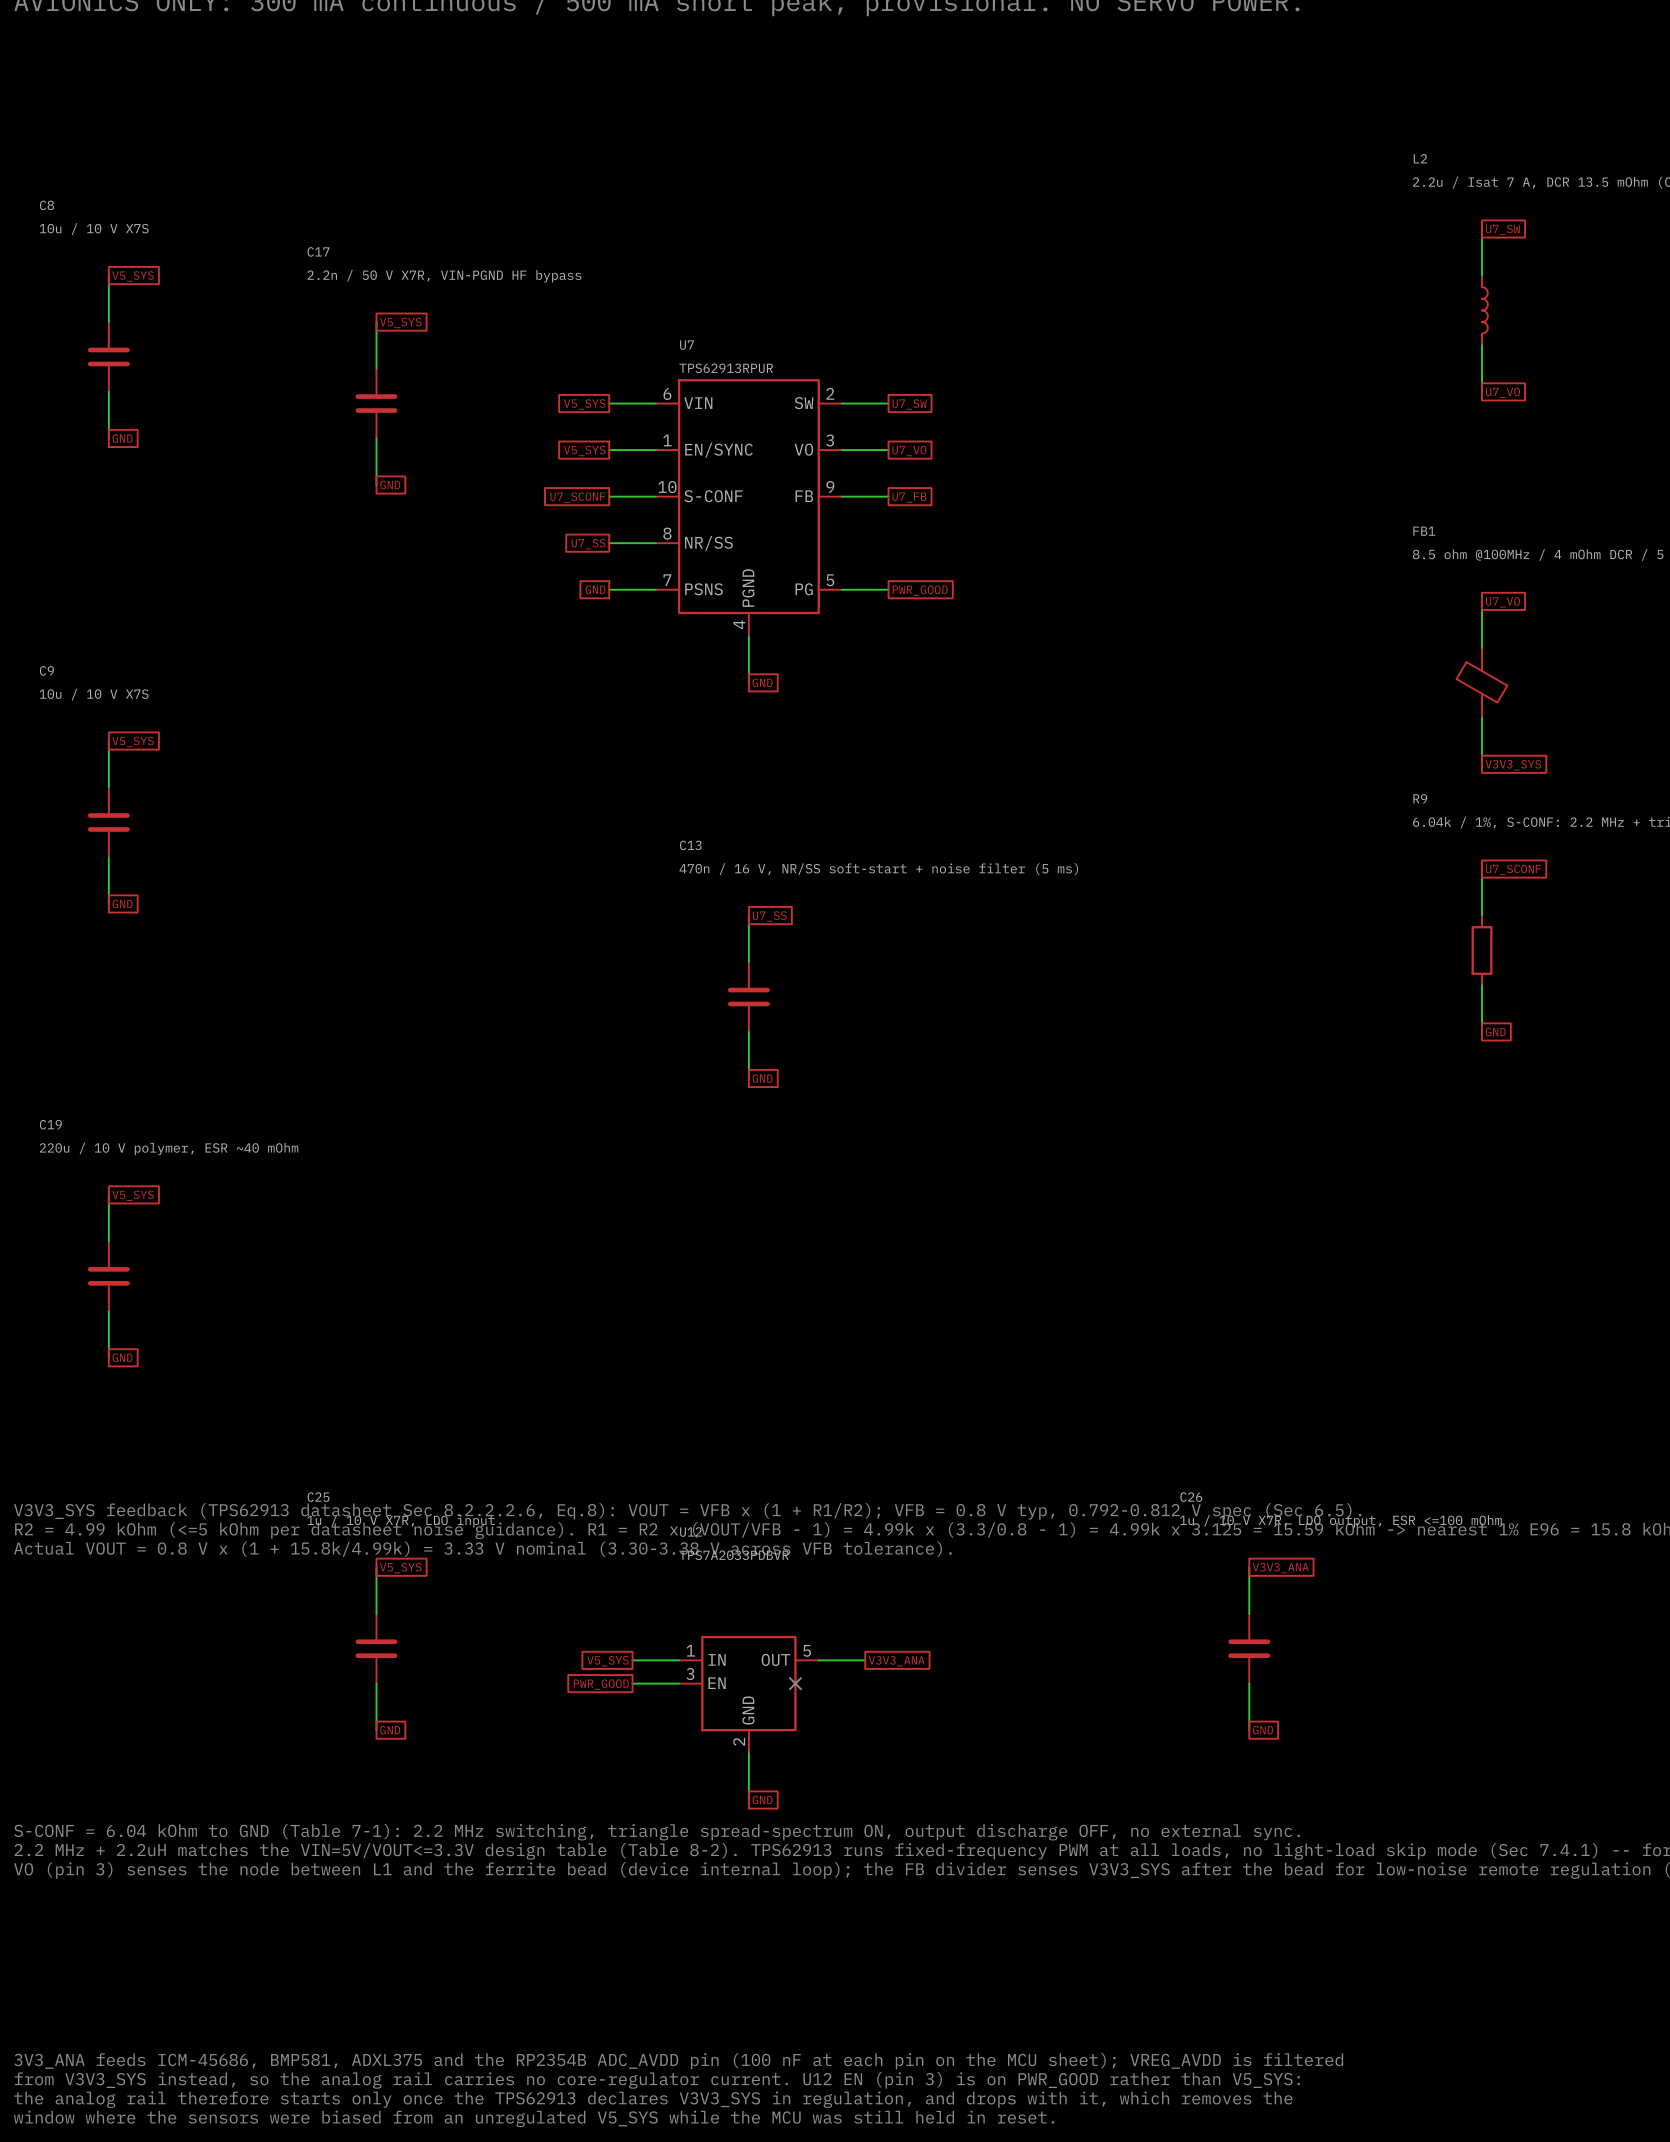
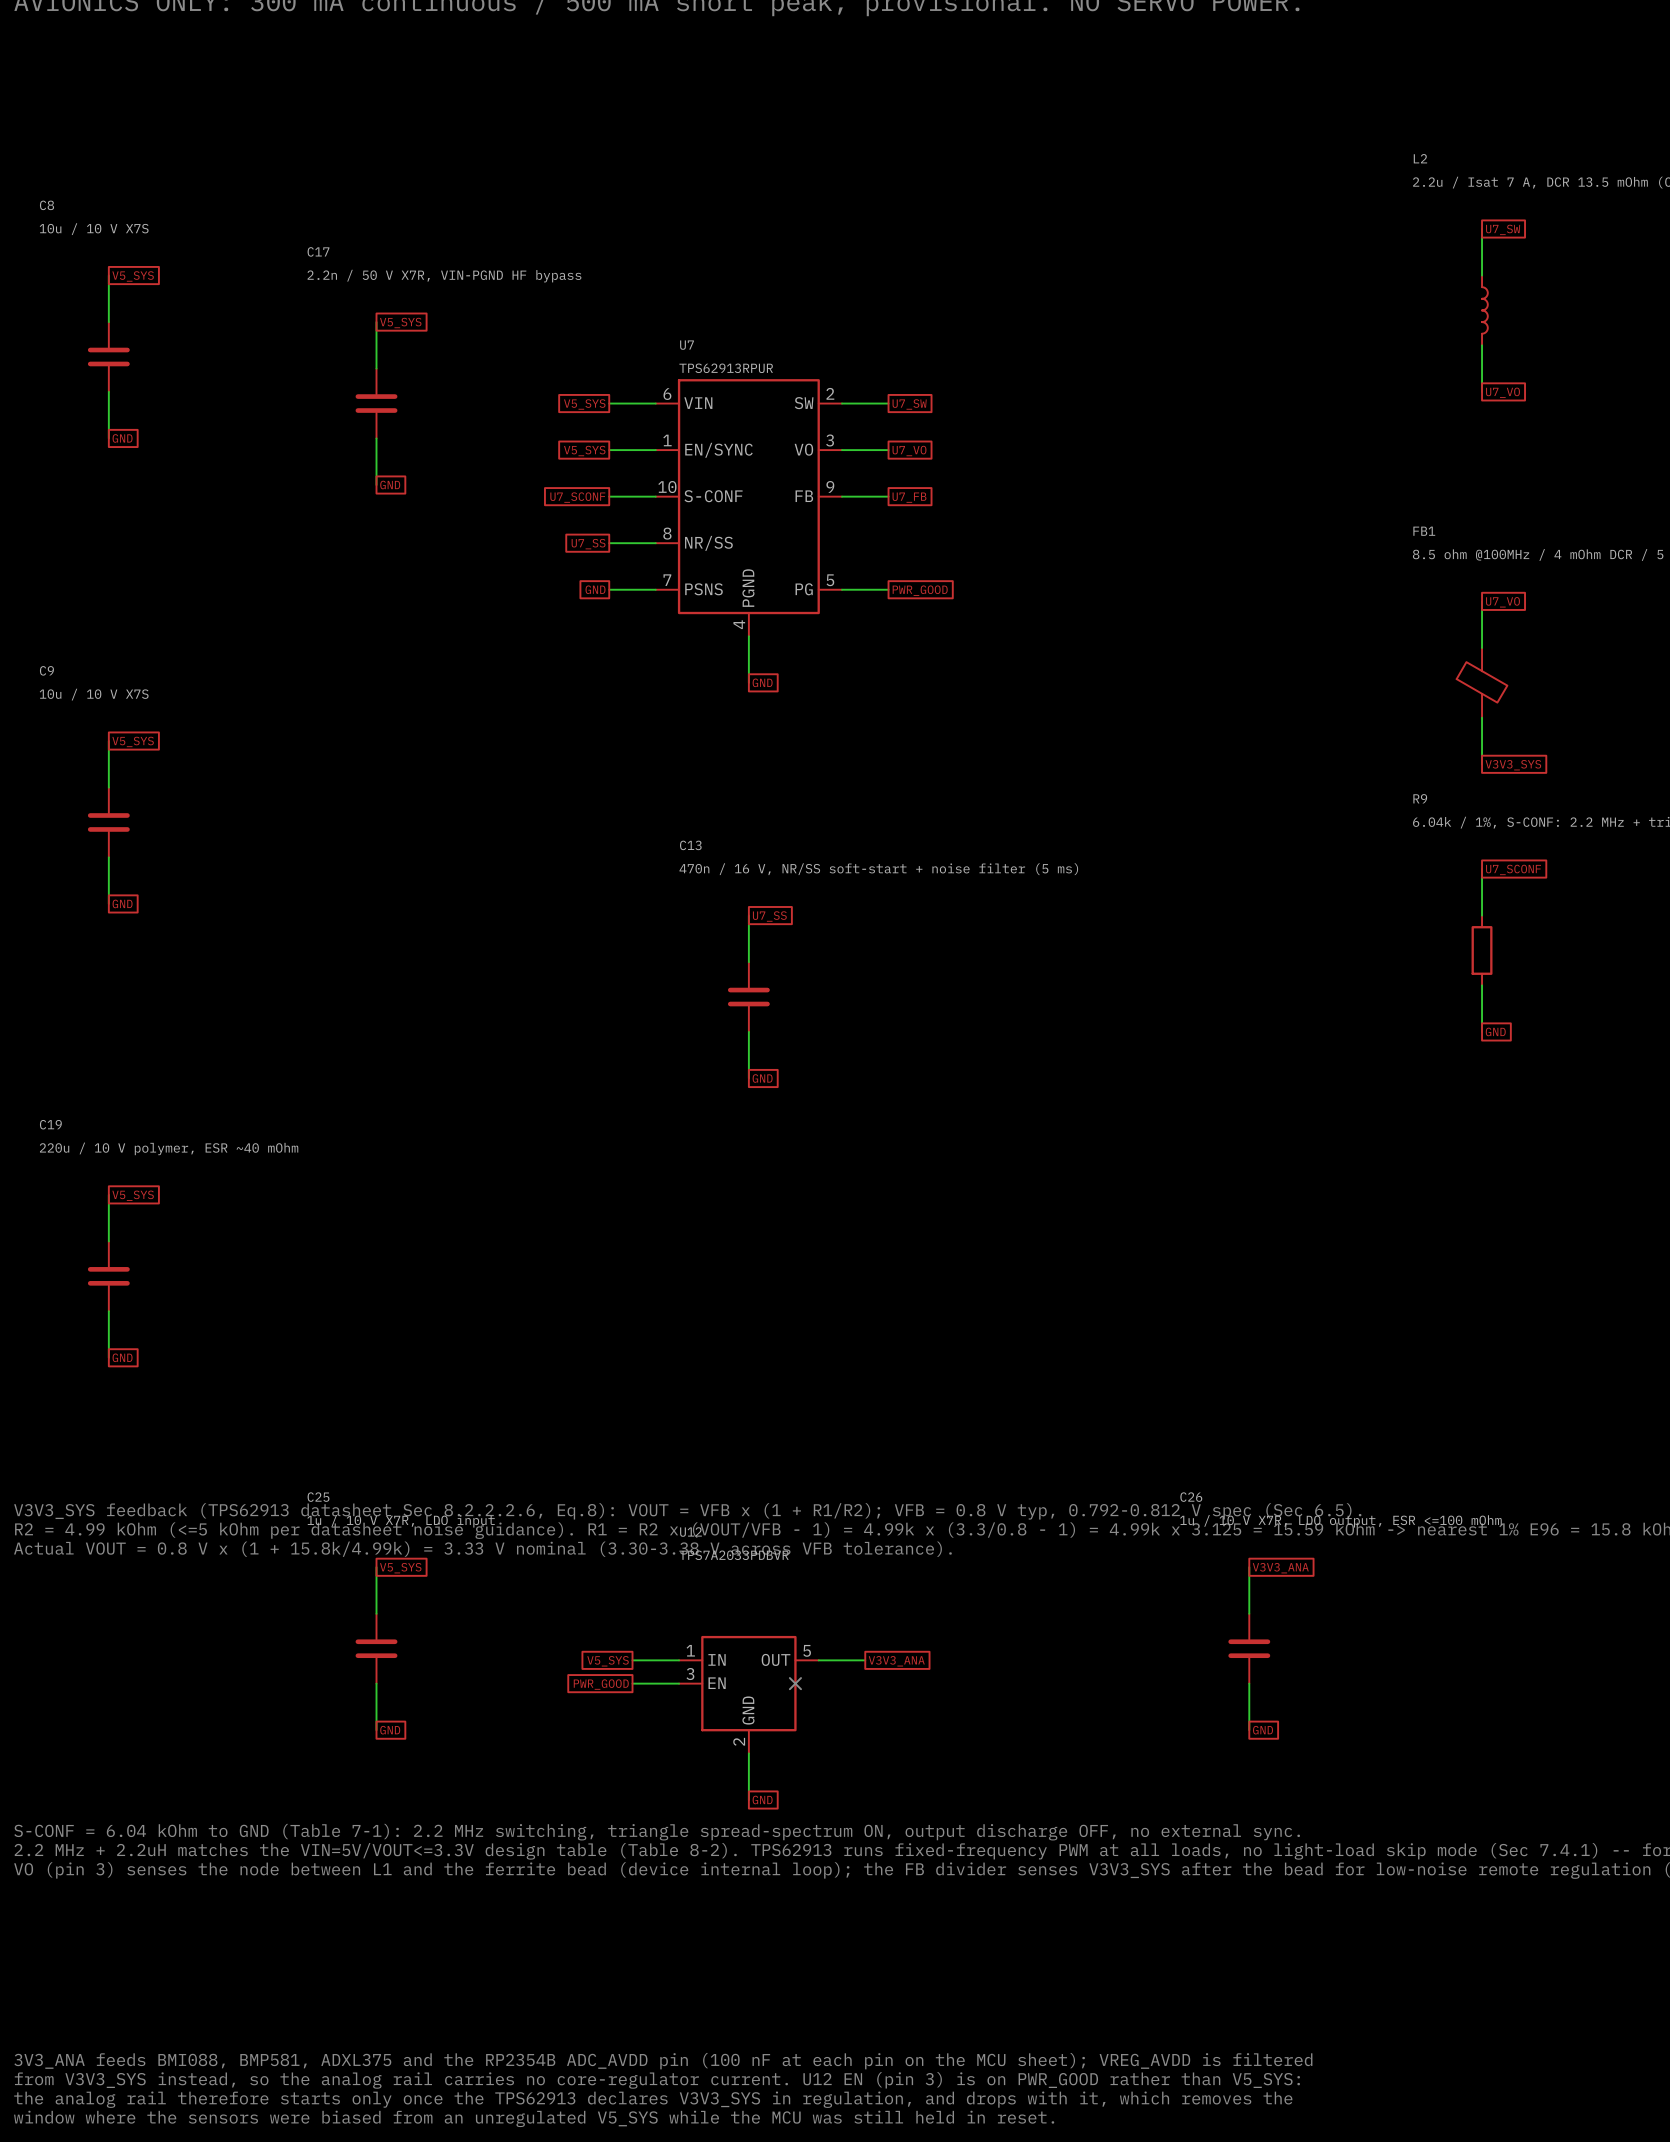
text: 3V3_ANA feeds ICM-45686, BMP581, ADXL375 and the RP2354B ADC_AVDD pin (100 nF at each pin on the MCU sheet); VREG_AVDD is filtered (678, 2061) -> 3V3_ANA feeds BMI088, BMP581, ADXL375 and the RP2354B ADC_AVDD pin (100 nF at each pin on the MCU sheet); VREG_AVDD is filtered (663, 2061)

